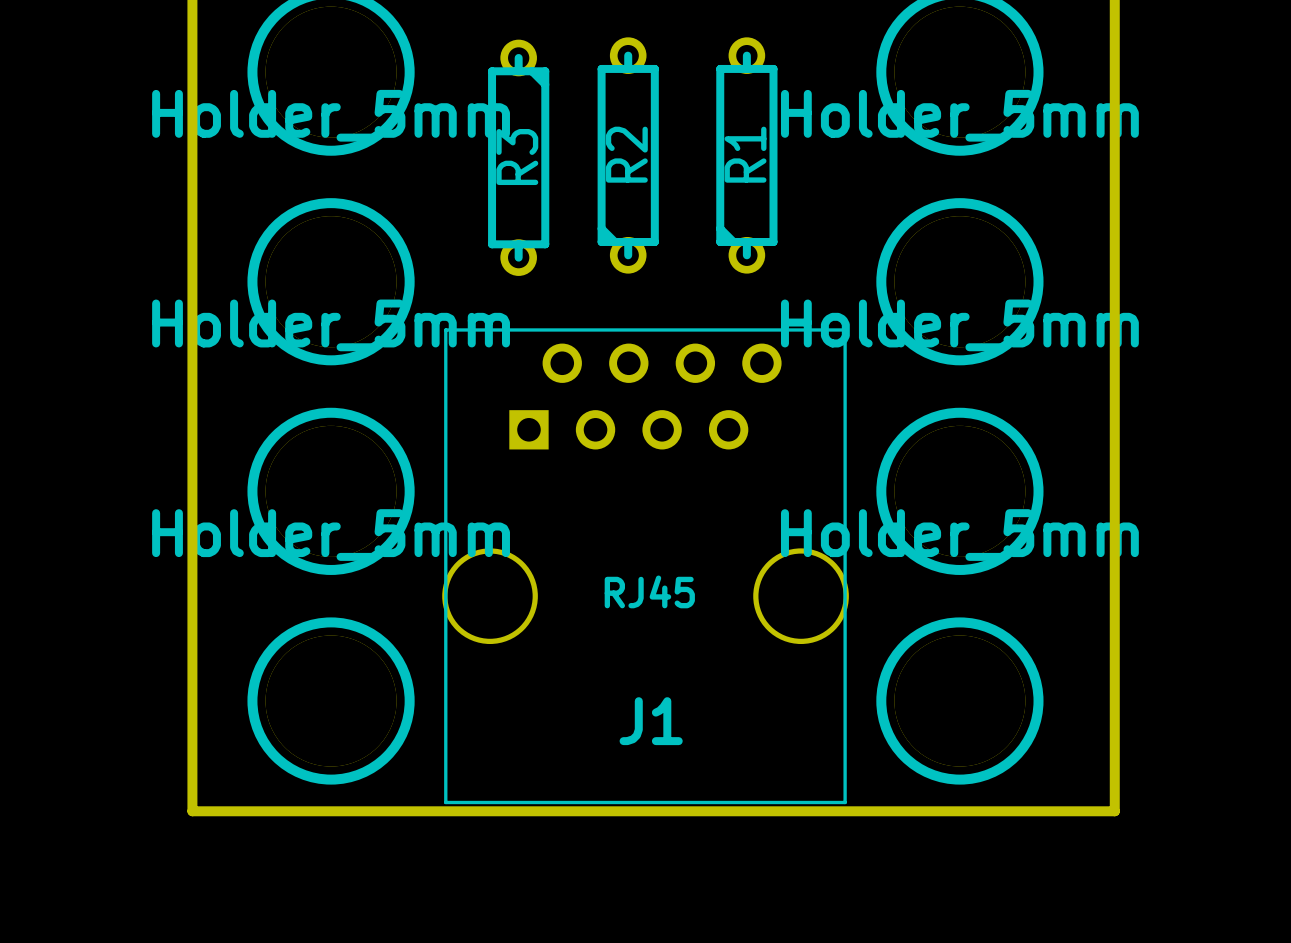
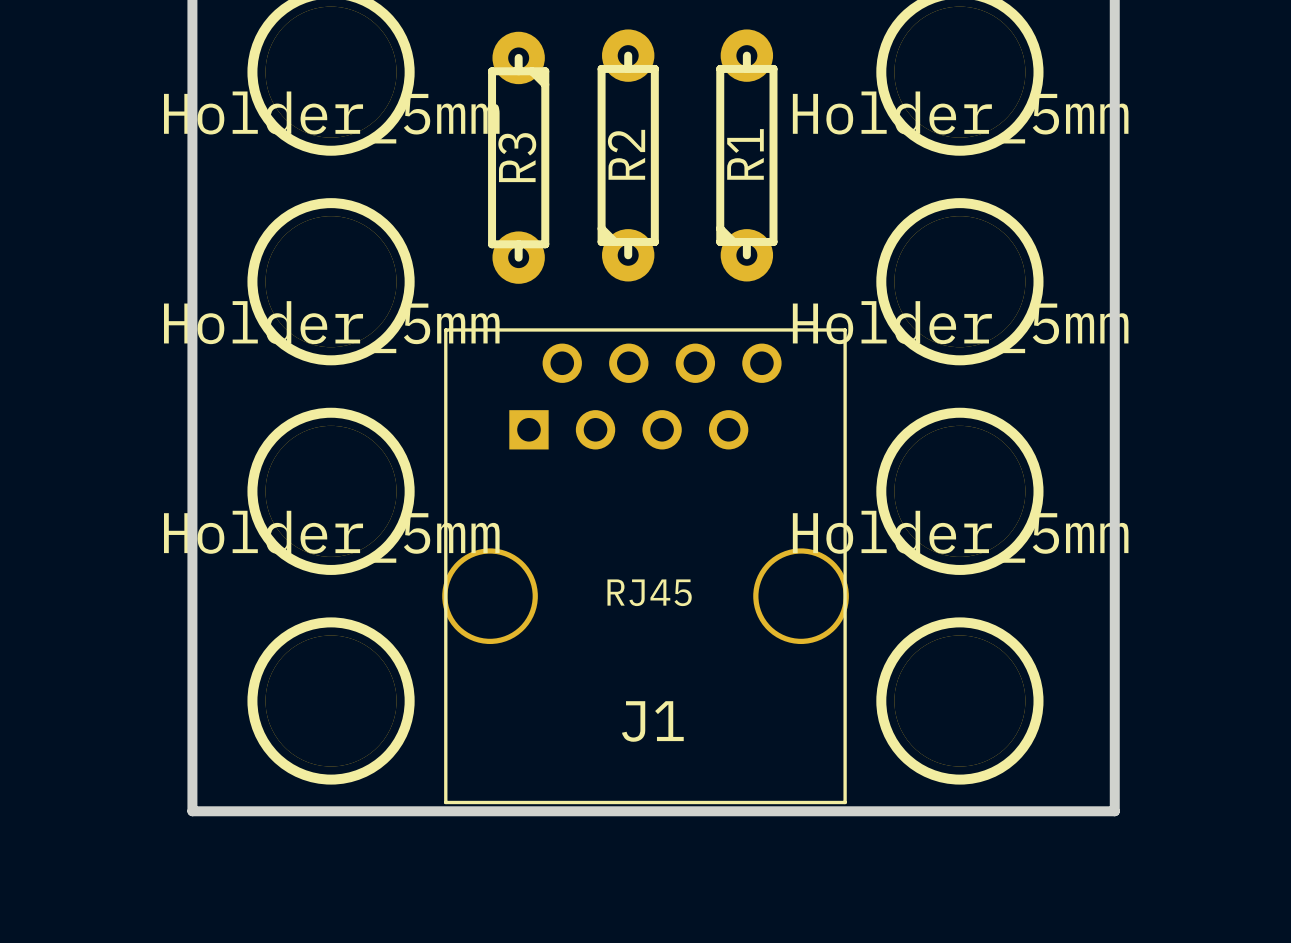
R2 footprint: [597, 37, 659, 274] -> [597, 29, 659, 282]
R1 footprint: [716, 37, 778, 274] -> [716, 29, 778, 282]
R3 footprint: [488, 39, 550, 276] -> [488, 31, 550, 284]

